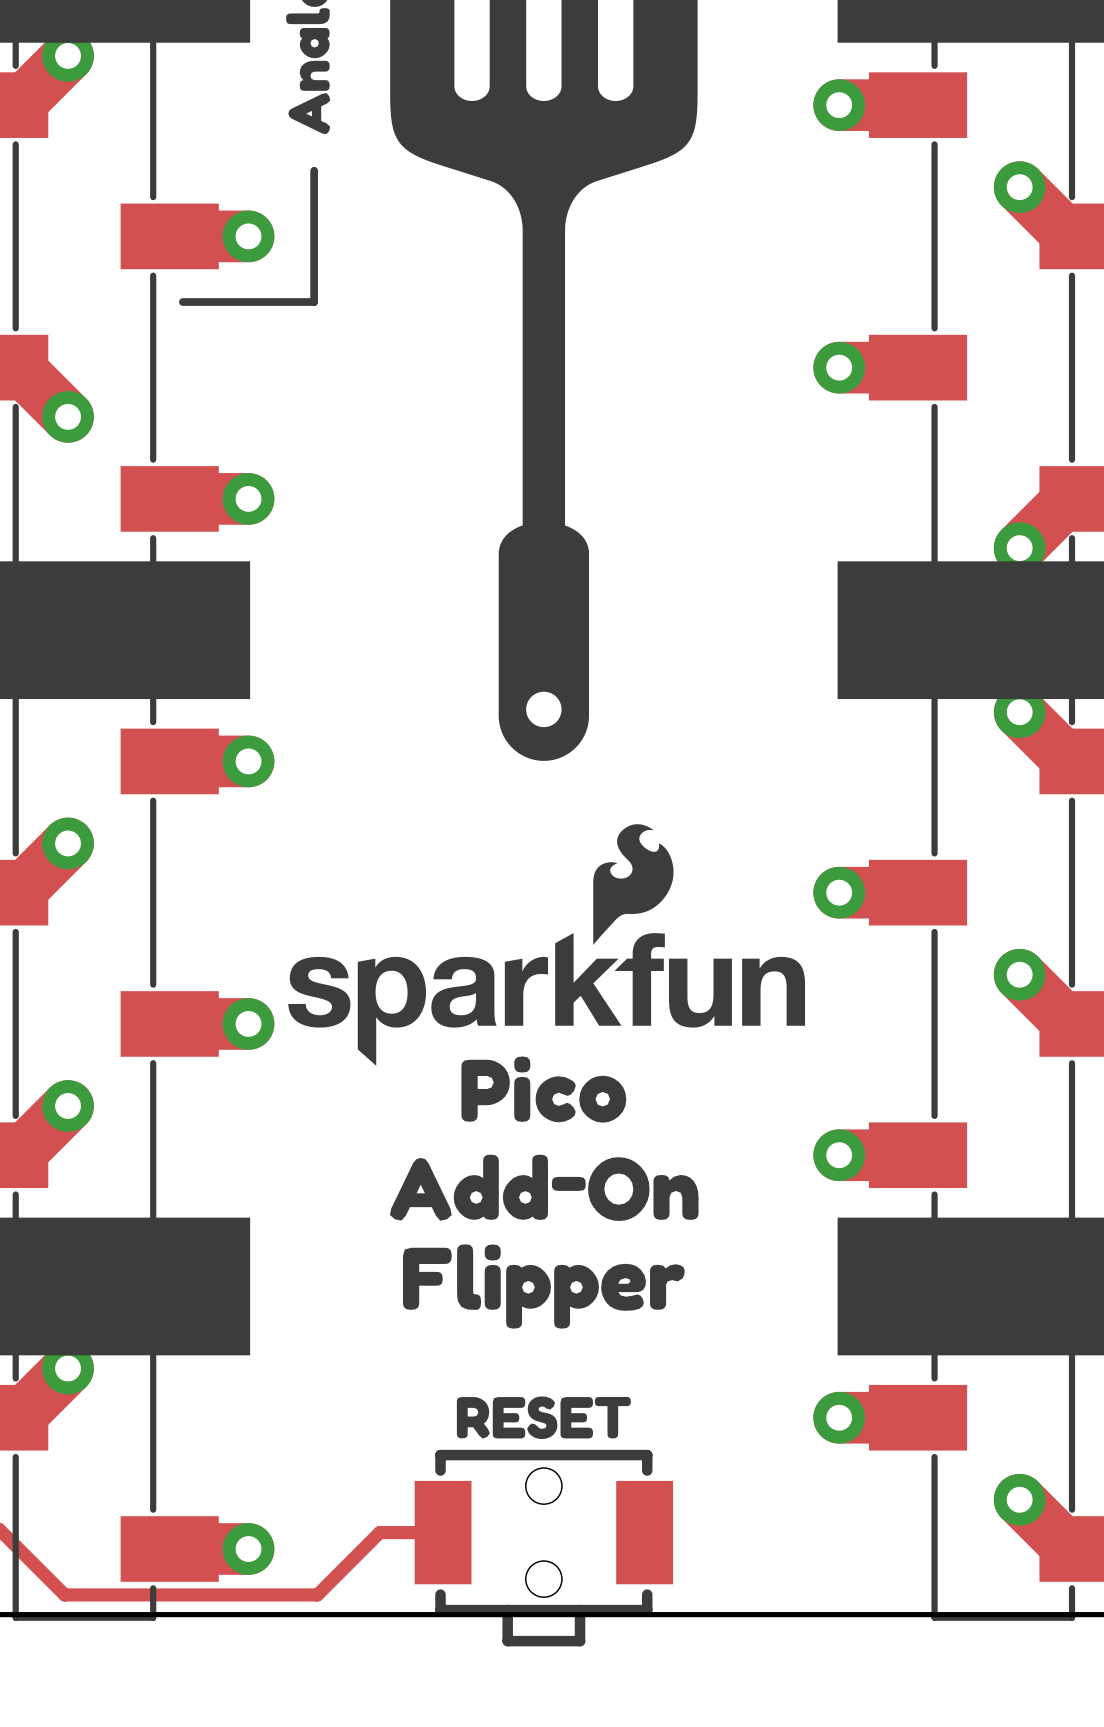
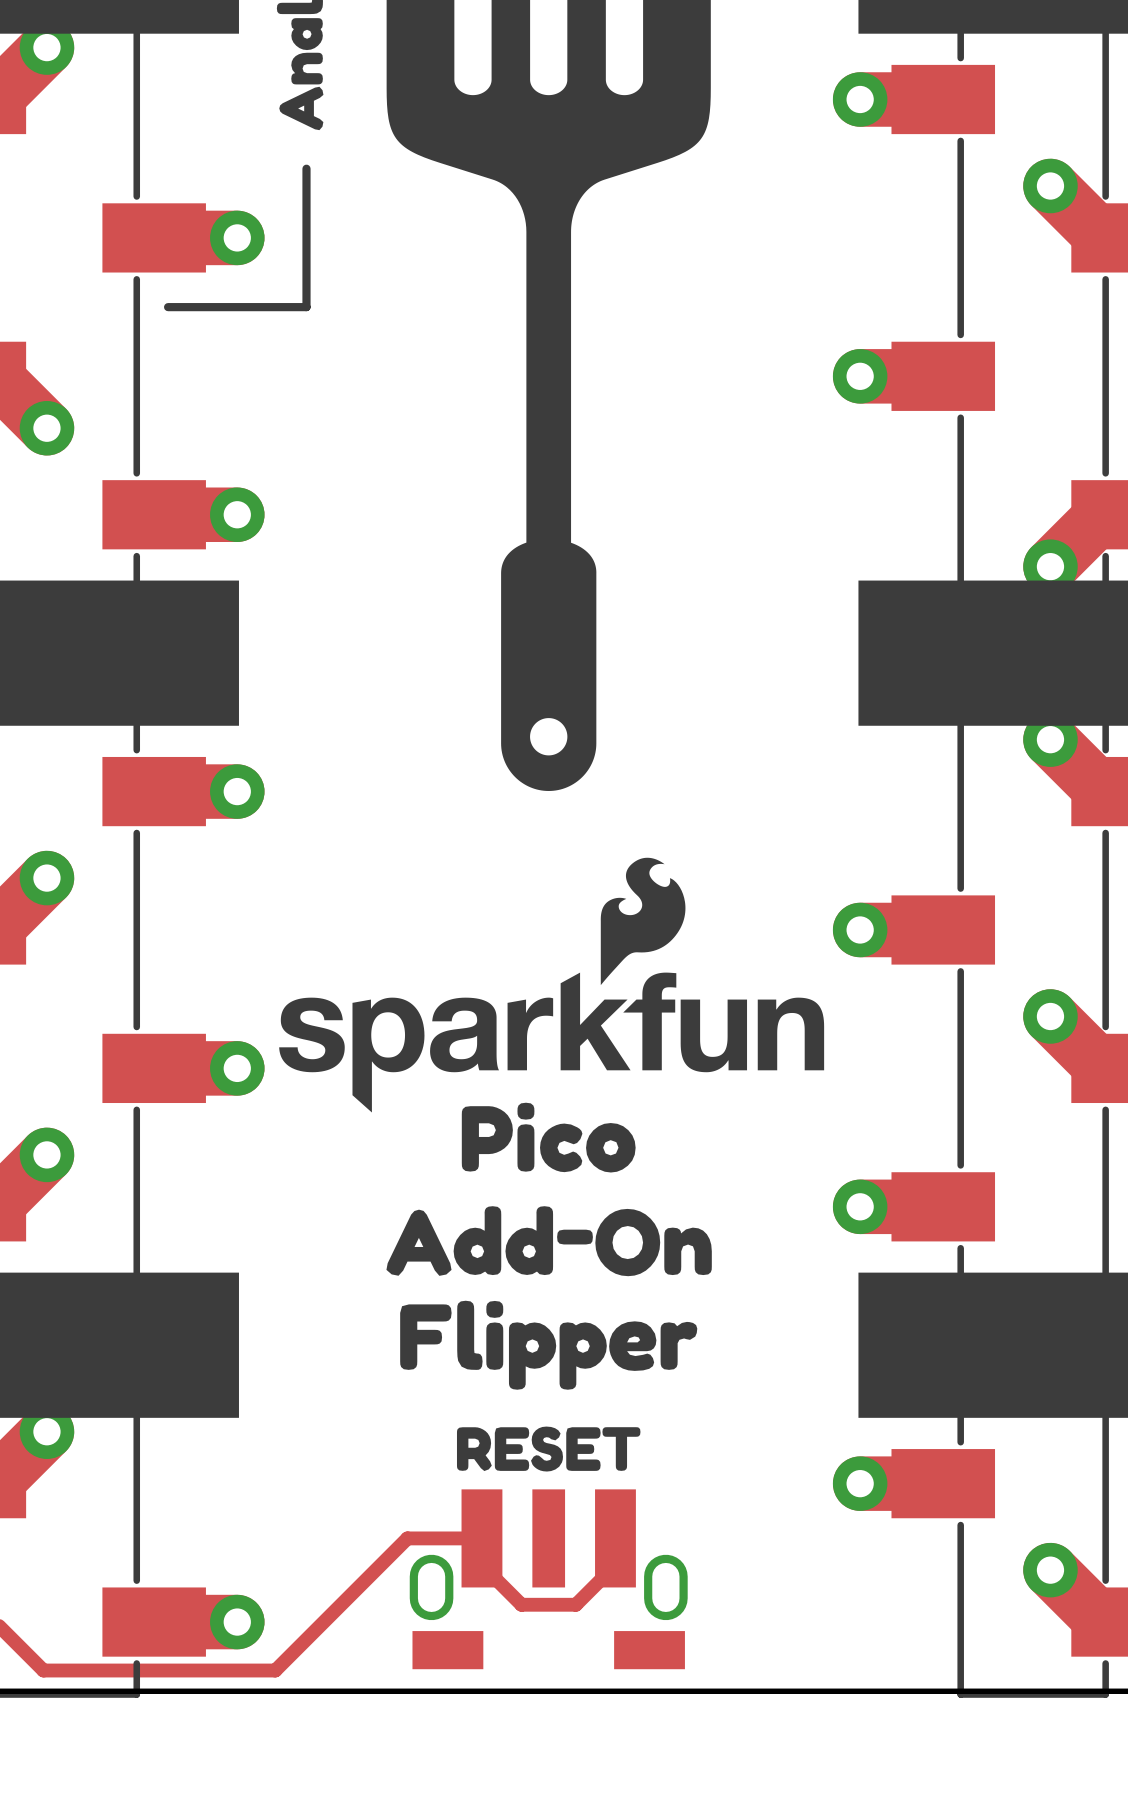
drawing position: (543, 1417) -> (548, 1449)
part footprint: [414, 1449, 674, 1647] -> [409, 1489, 688, 1670]
track: (443, 1532) (379, 1532) (317, 1594) (284, 1594) -> (615, 1538) (615, 1564) (575, 1604) (521, 1604) (482, 1565) (482, 1538) (407, 1538) (275, 1670)

